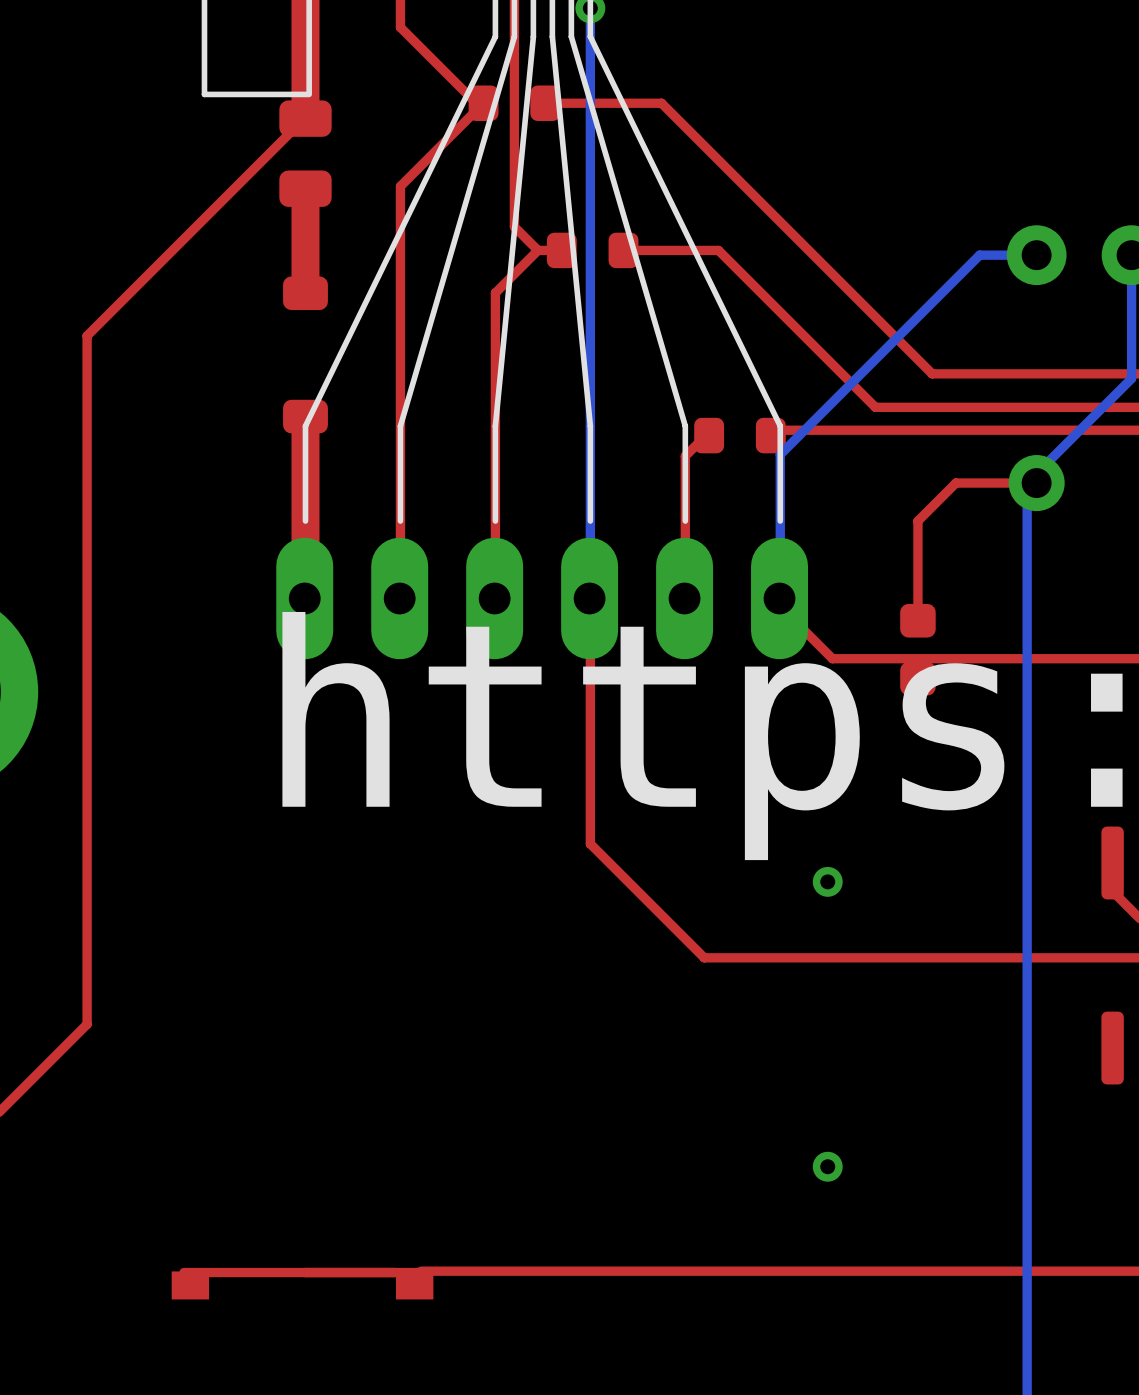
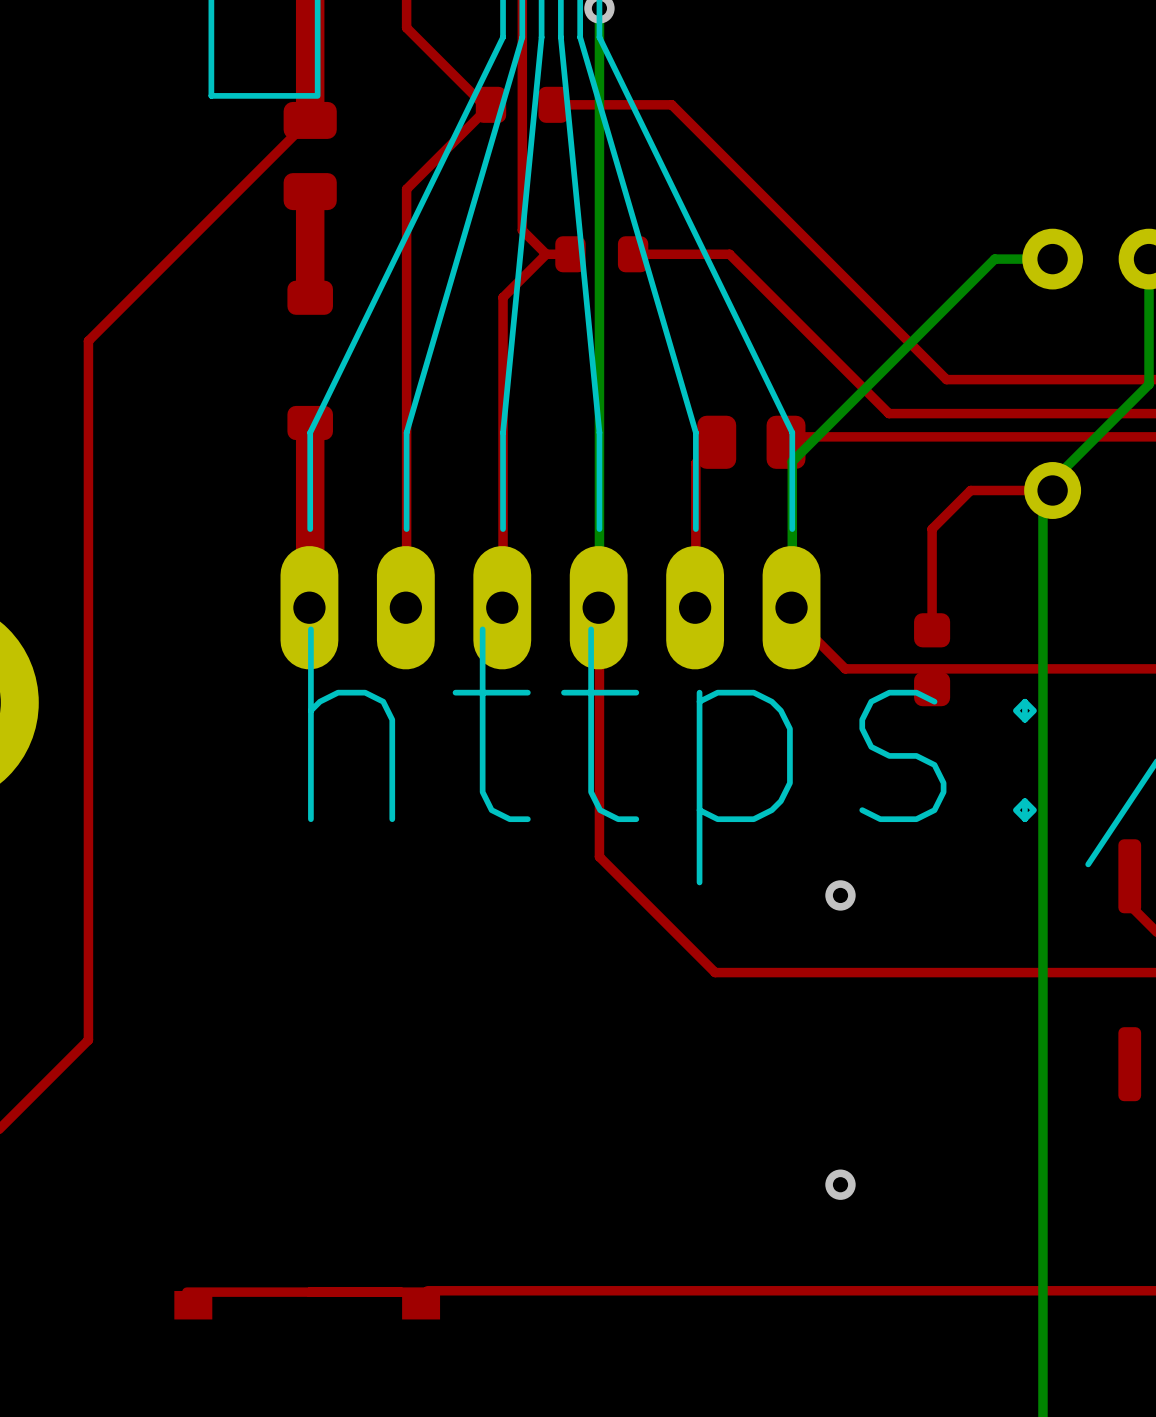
part footprint: [694, 417, 786, 454] -> [697, 415, 806, 469]

